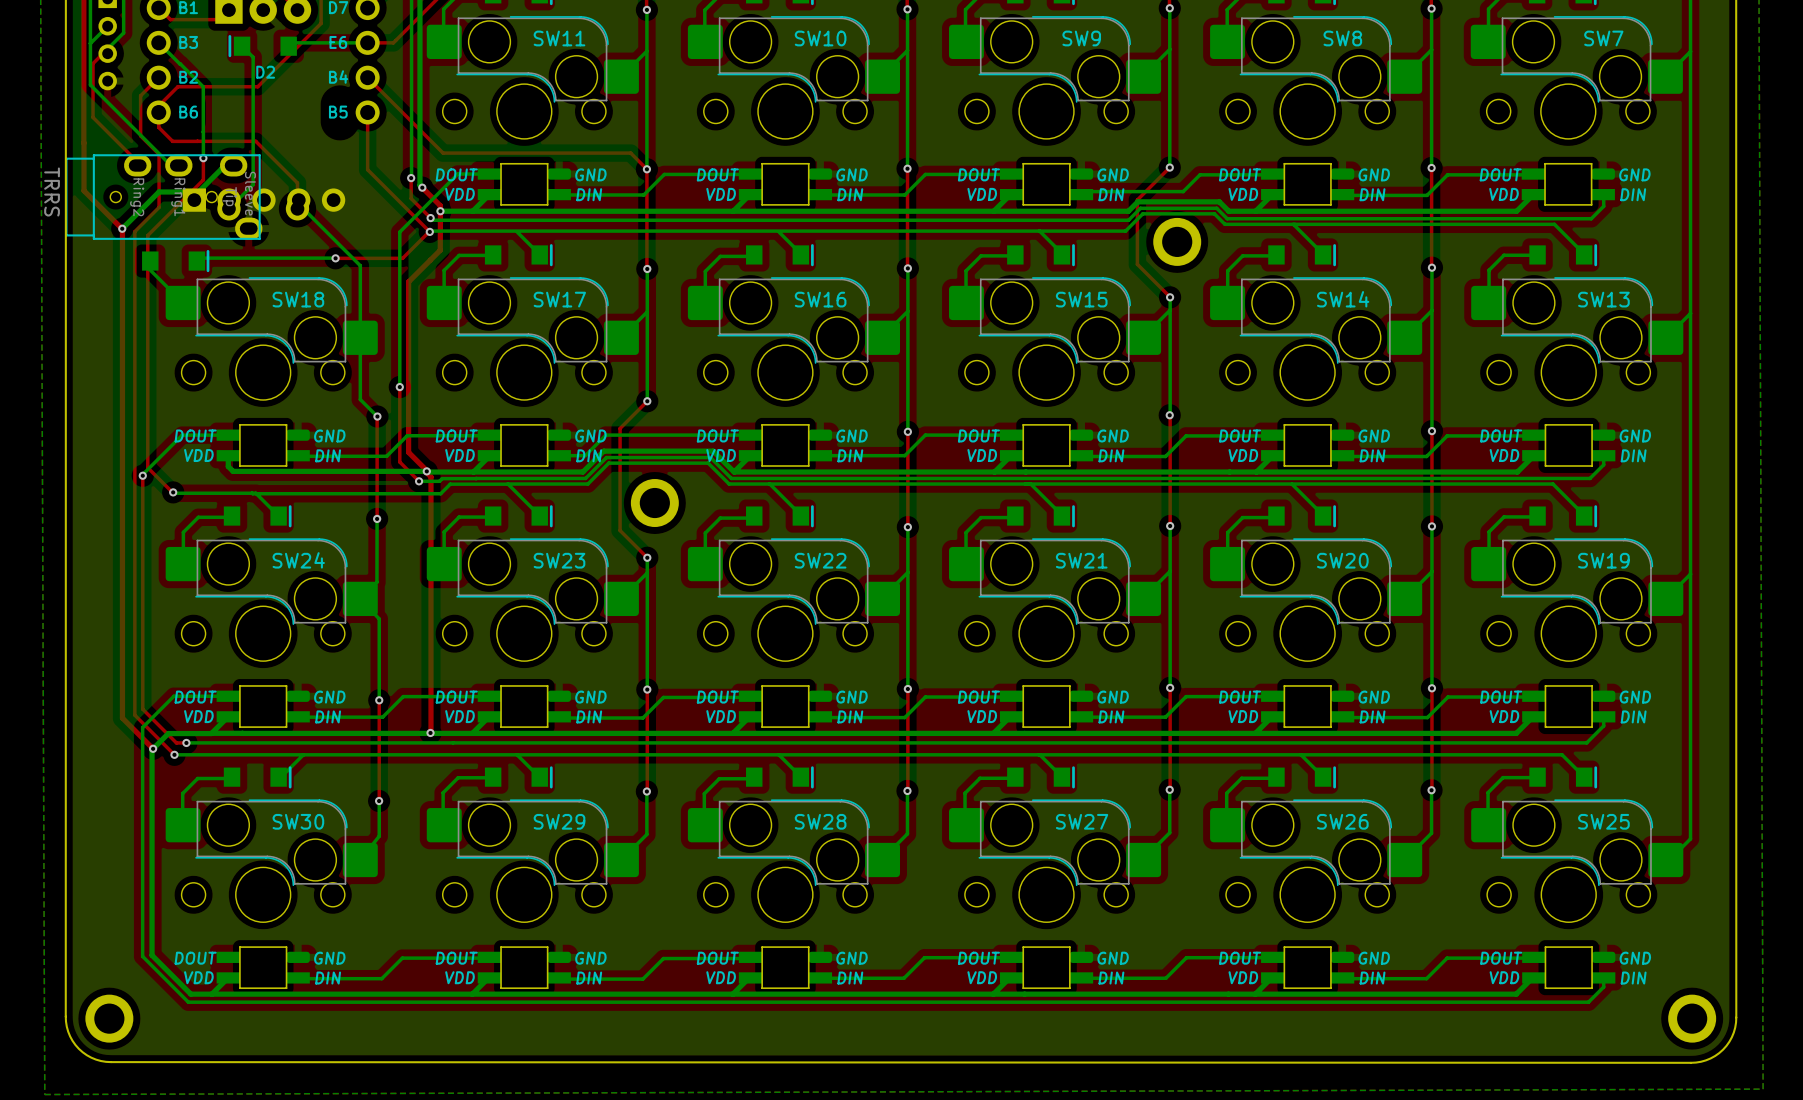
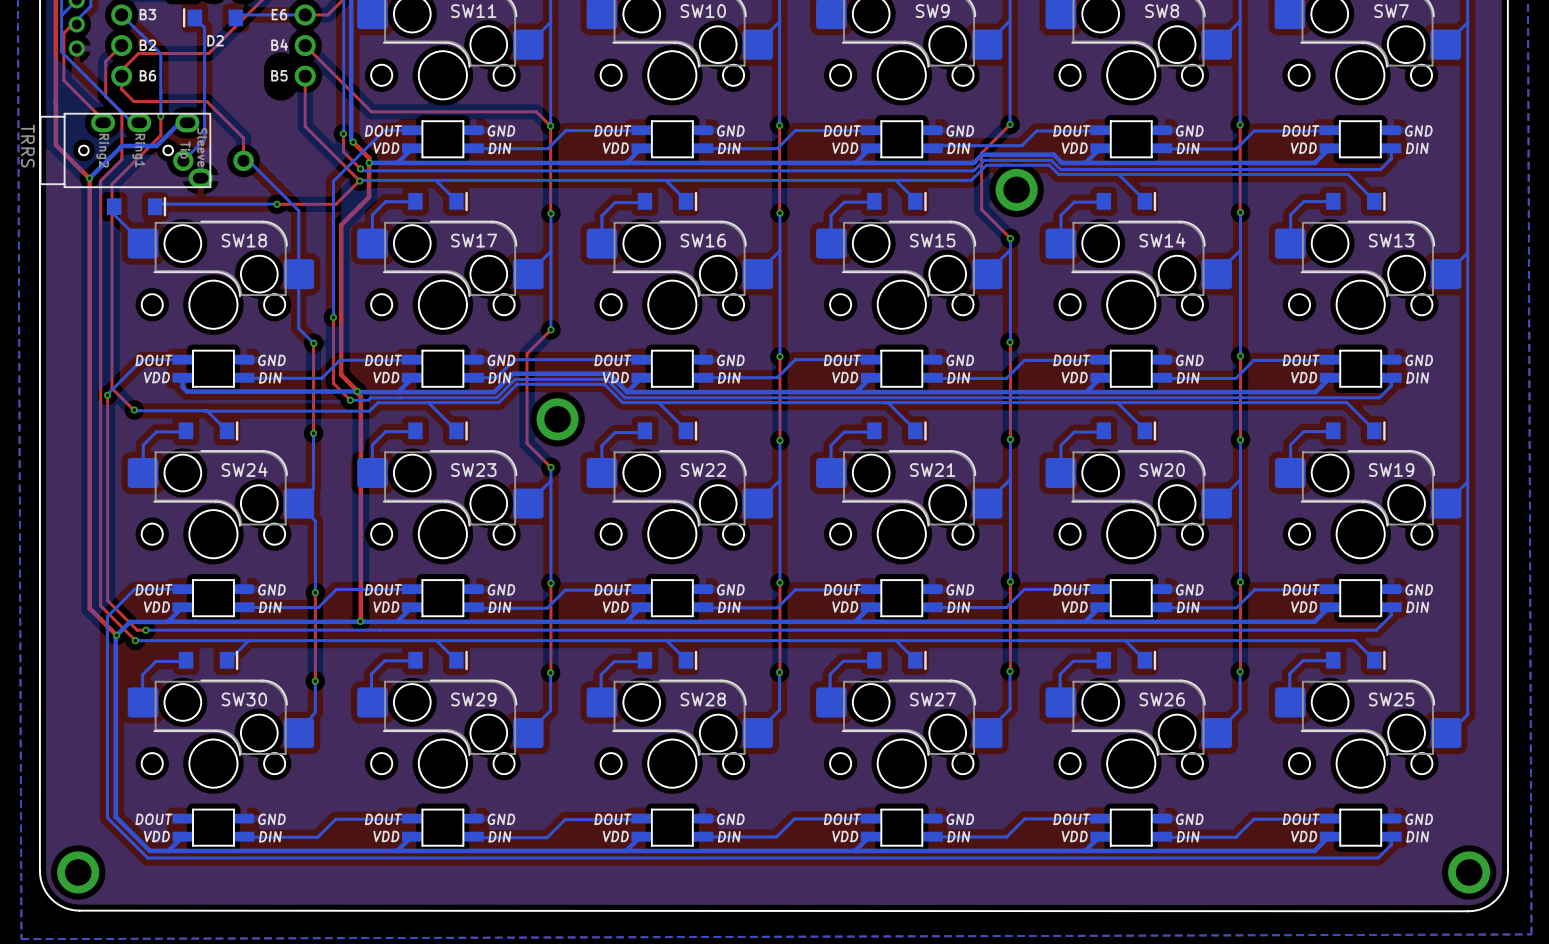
part: (263, 200) -> none

